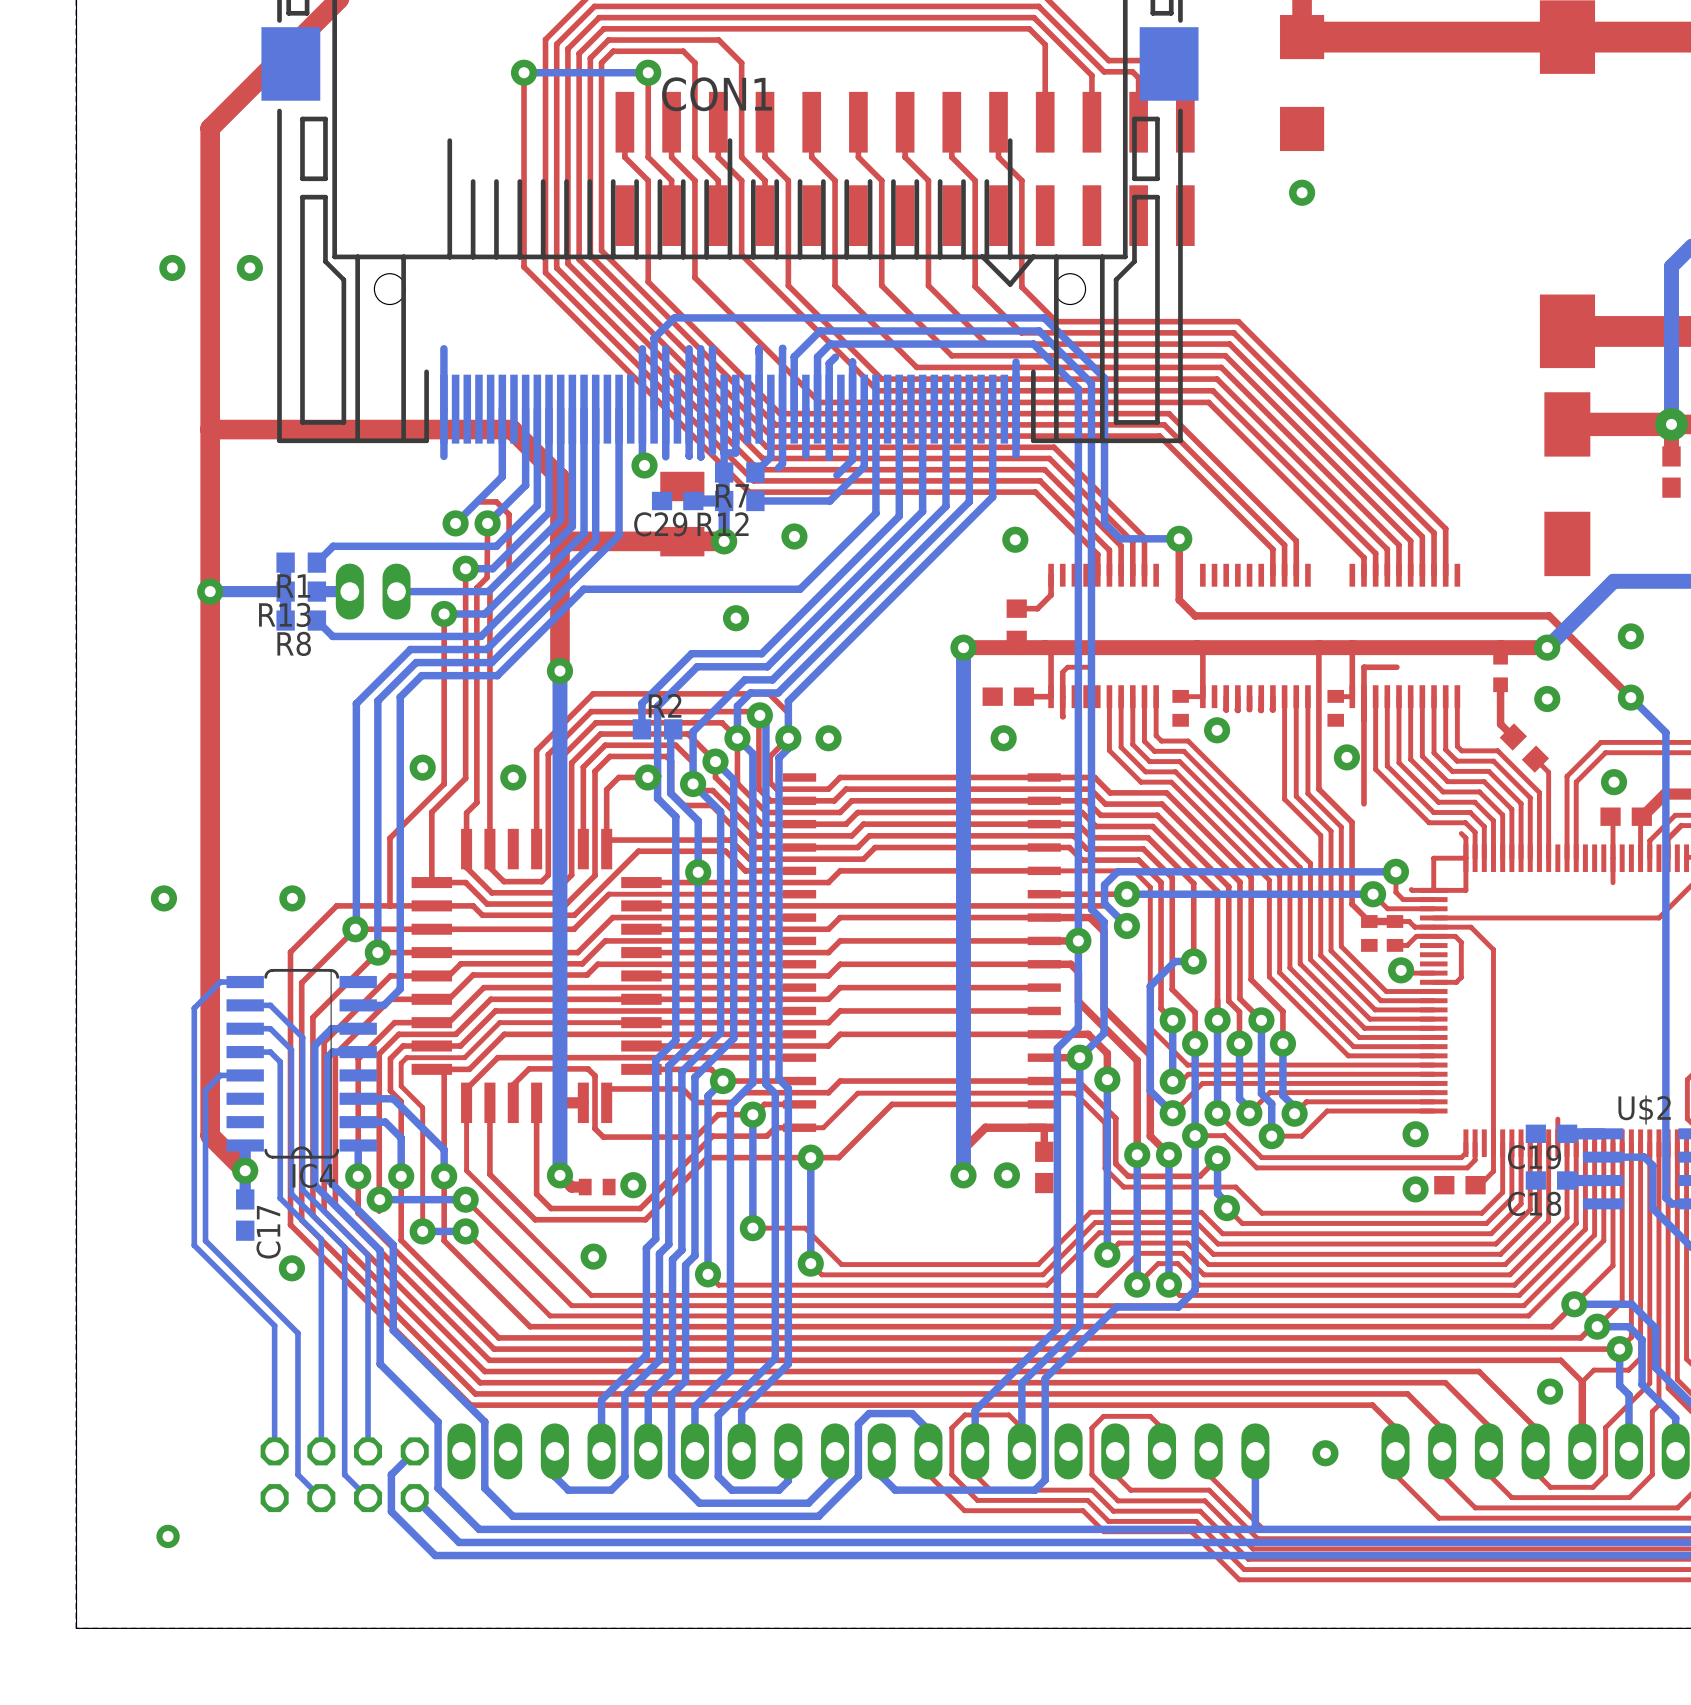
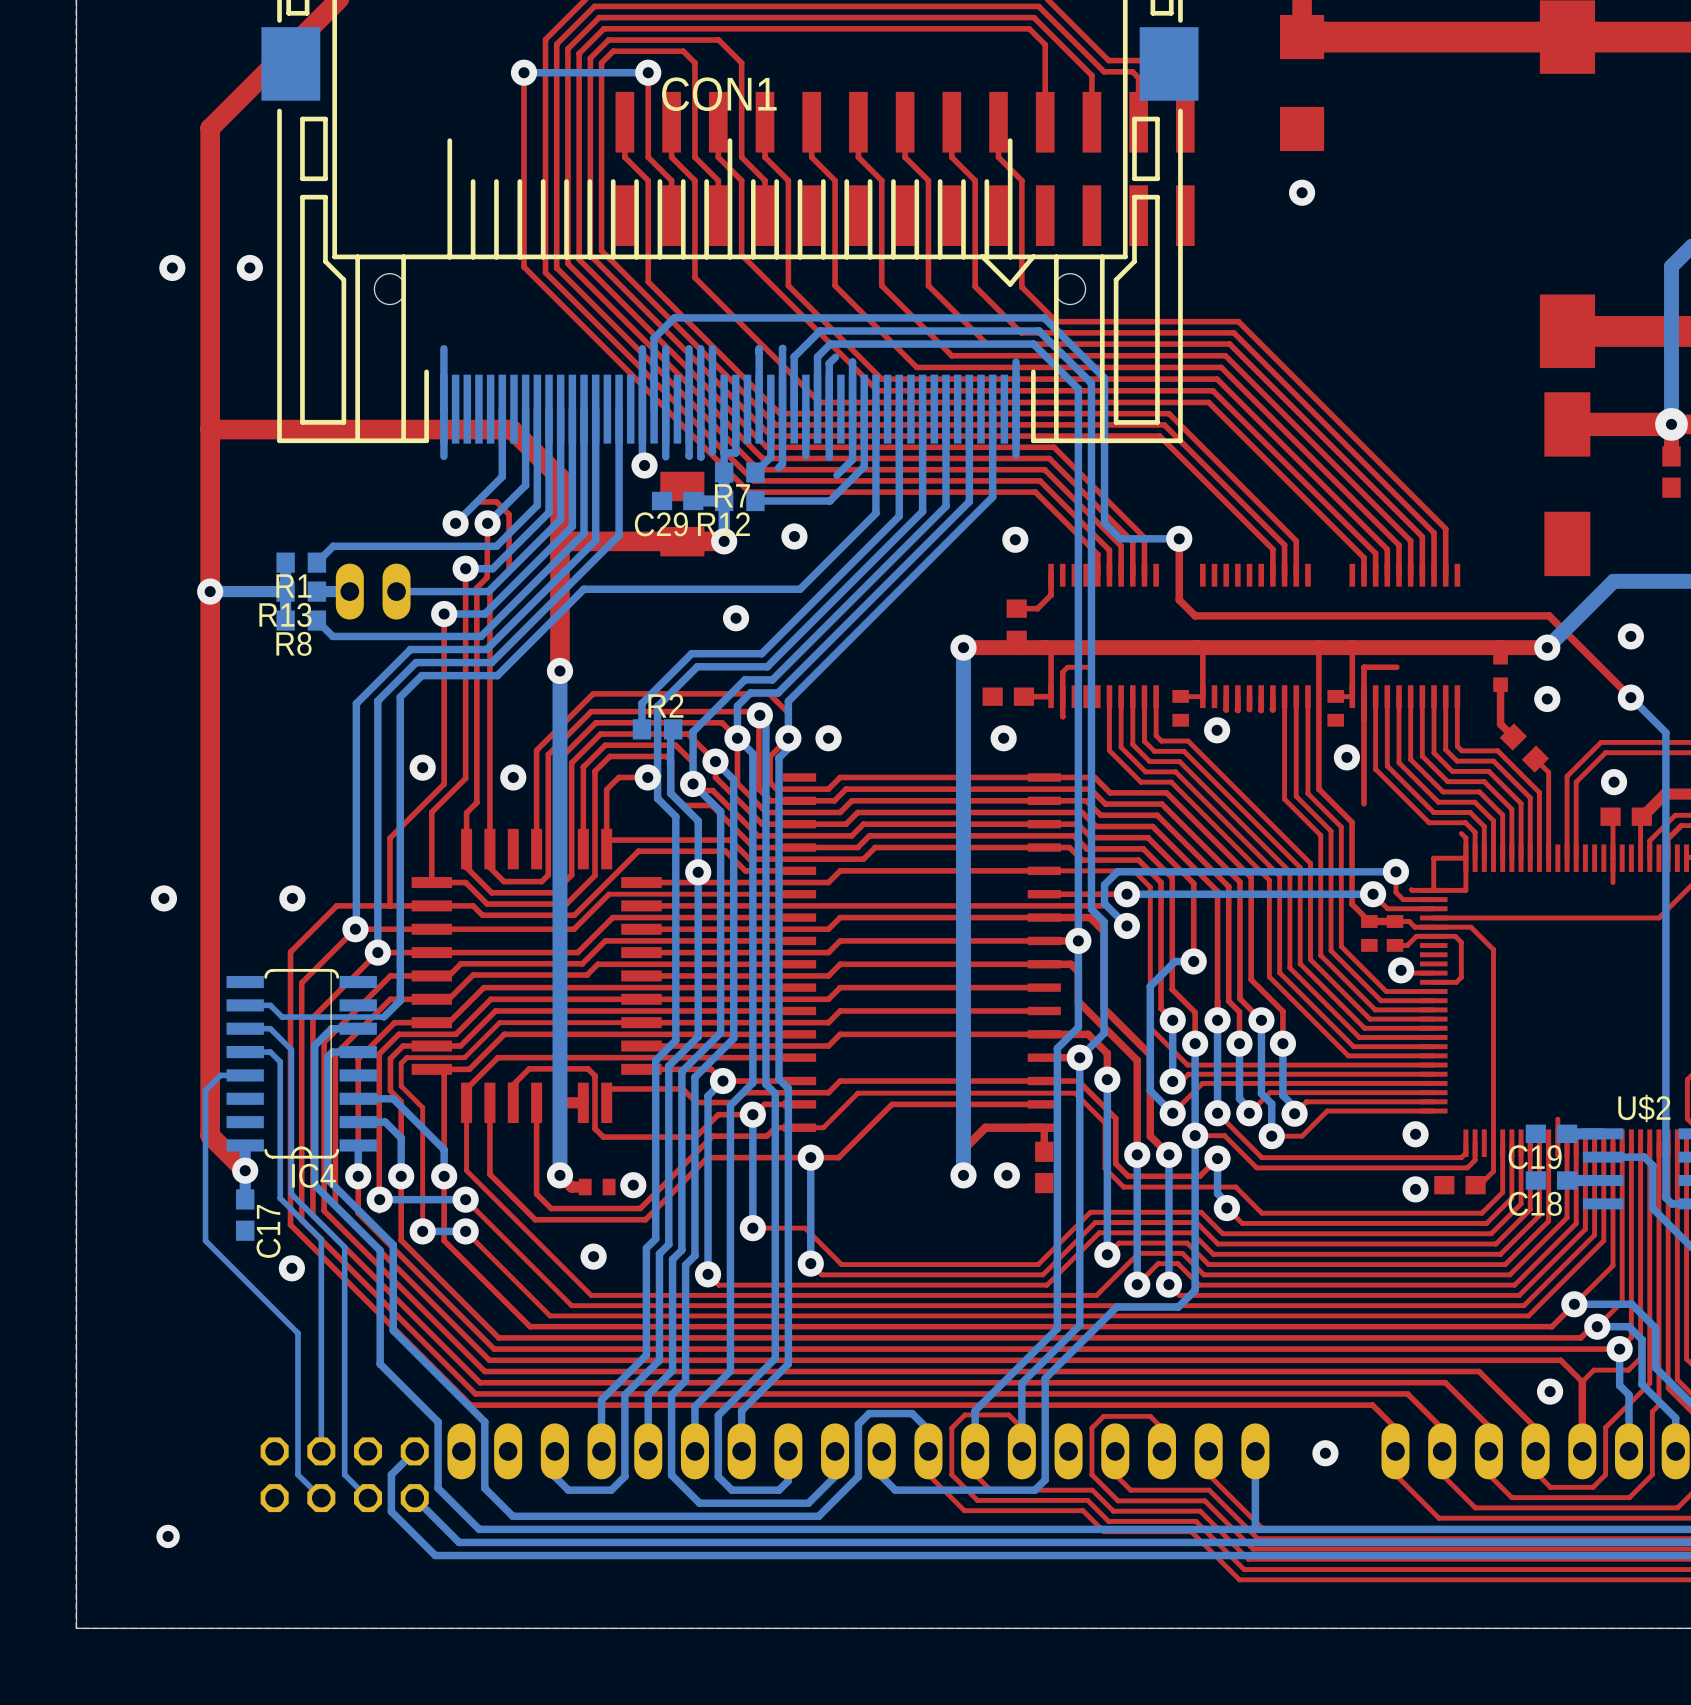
bottom track: (245, 982) (220, 982) (194, 1008) (194, 1245) (274, 1325) (274, 1451) -> none
bottom track: (400, 989) (383, 1005) (358, 1005) -> (400, 989) (400, 1000) (383, 1017) (282, 1017)
bottom track: (282, 1017) (302, 1037) (302, 1189) (368, 1255) (368, 1451) -> none

